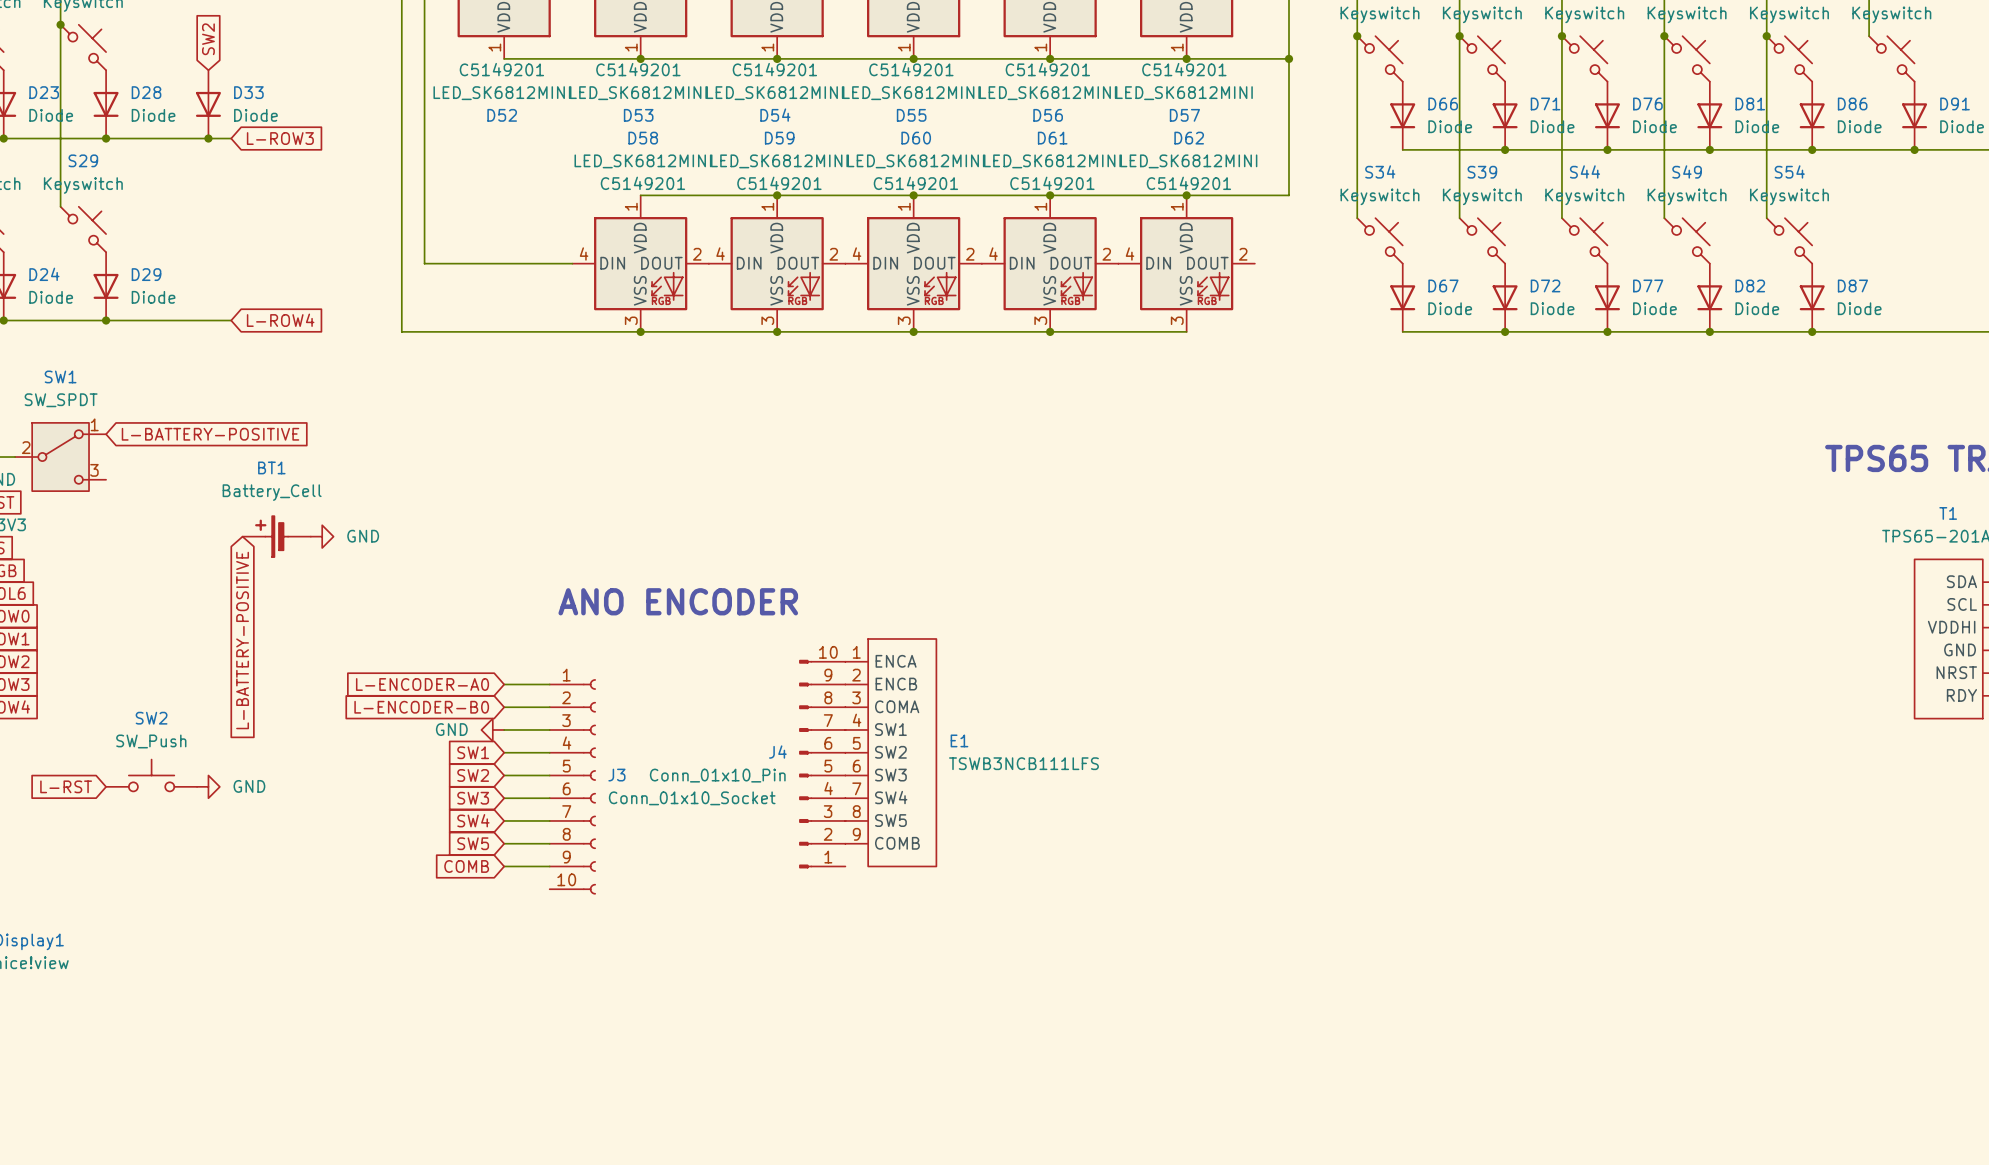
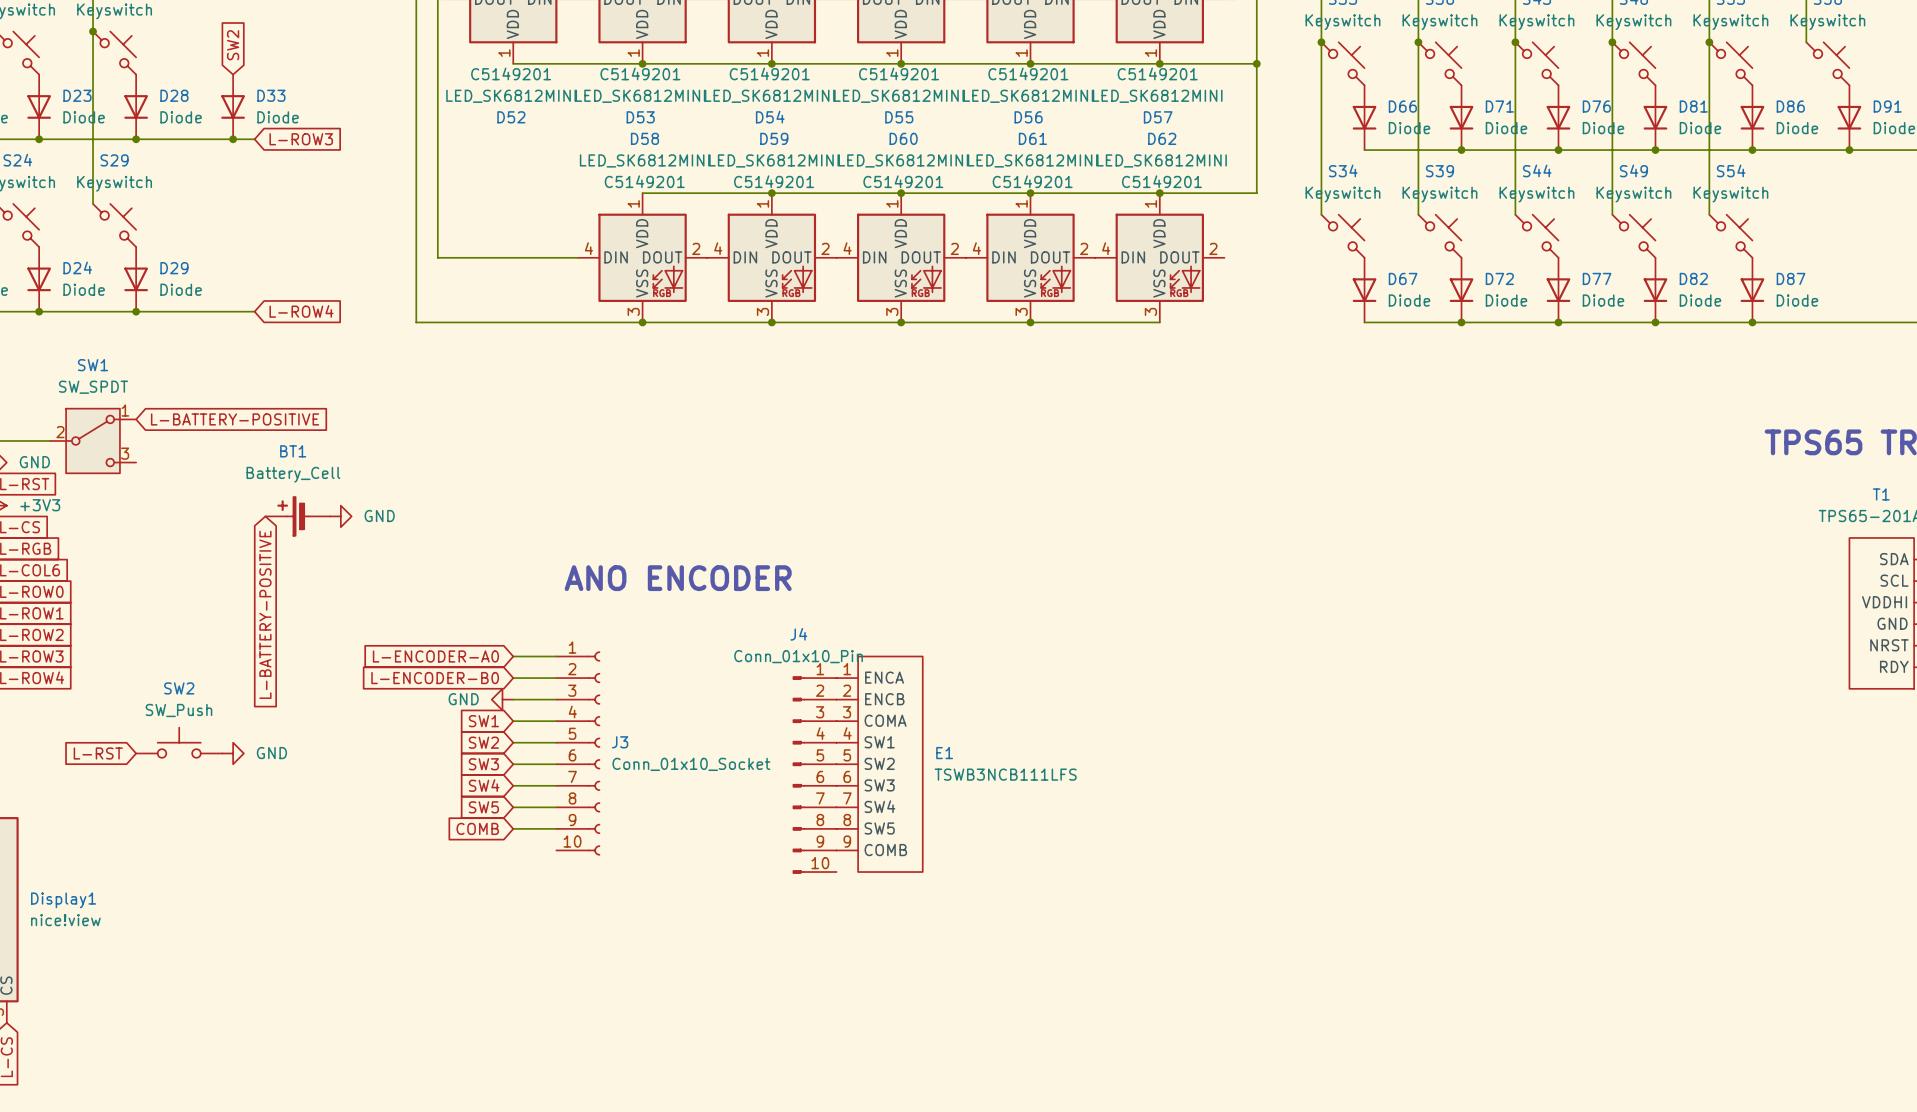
J4 name position: J4 (777, 752) -> J4 (798, 634)
E1 position: (890, 752) -> (879, 764)
J4 flip: as is (805, 764) -> up-down (798, 775)
J4 value position: Conn_01x10_Pin (717, 775) -> Conn_01x10_Pin (798, 656)

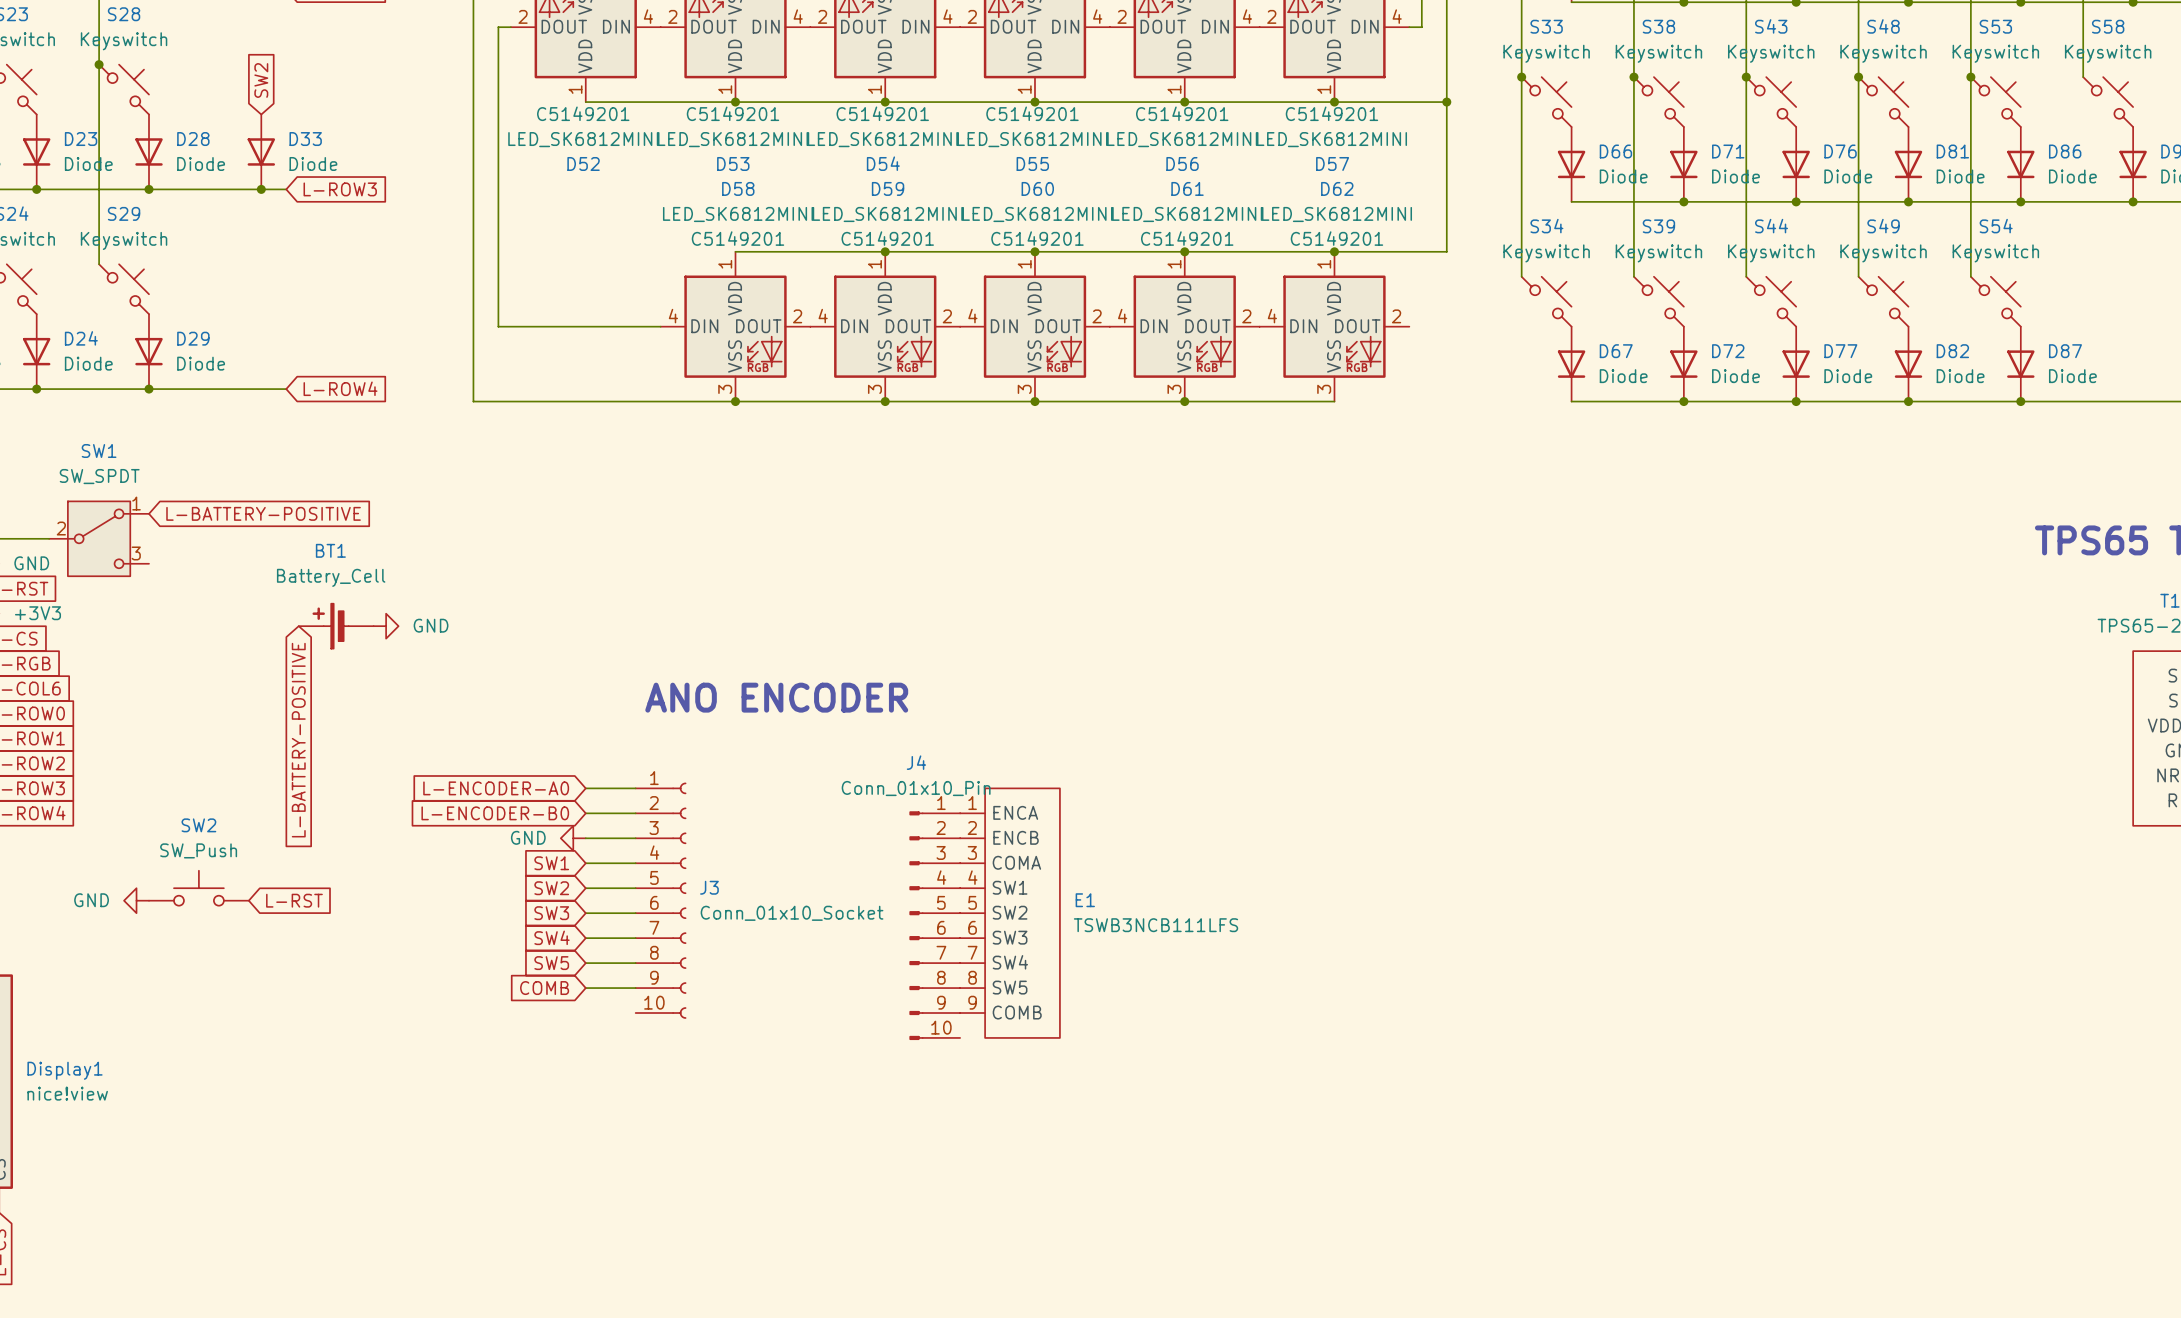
global label rotation: 0° (98, 753) -> 180° (294, 900)
global label position: L-RST (98, 753) -> L-RST (294, 900)
power symbol rotation: 0° (233, 753) -> 180° (136, 900)
power symbol position: GND (233, 753) -> GND (136, 900)

